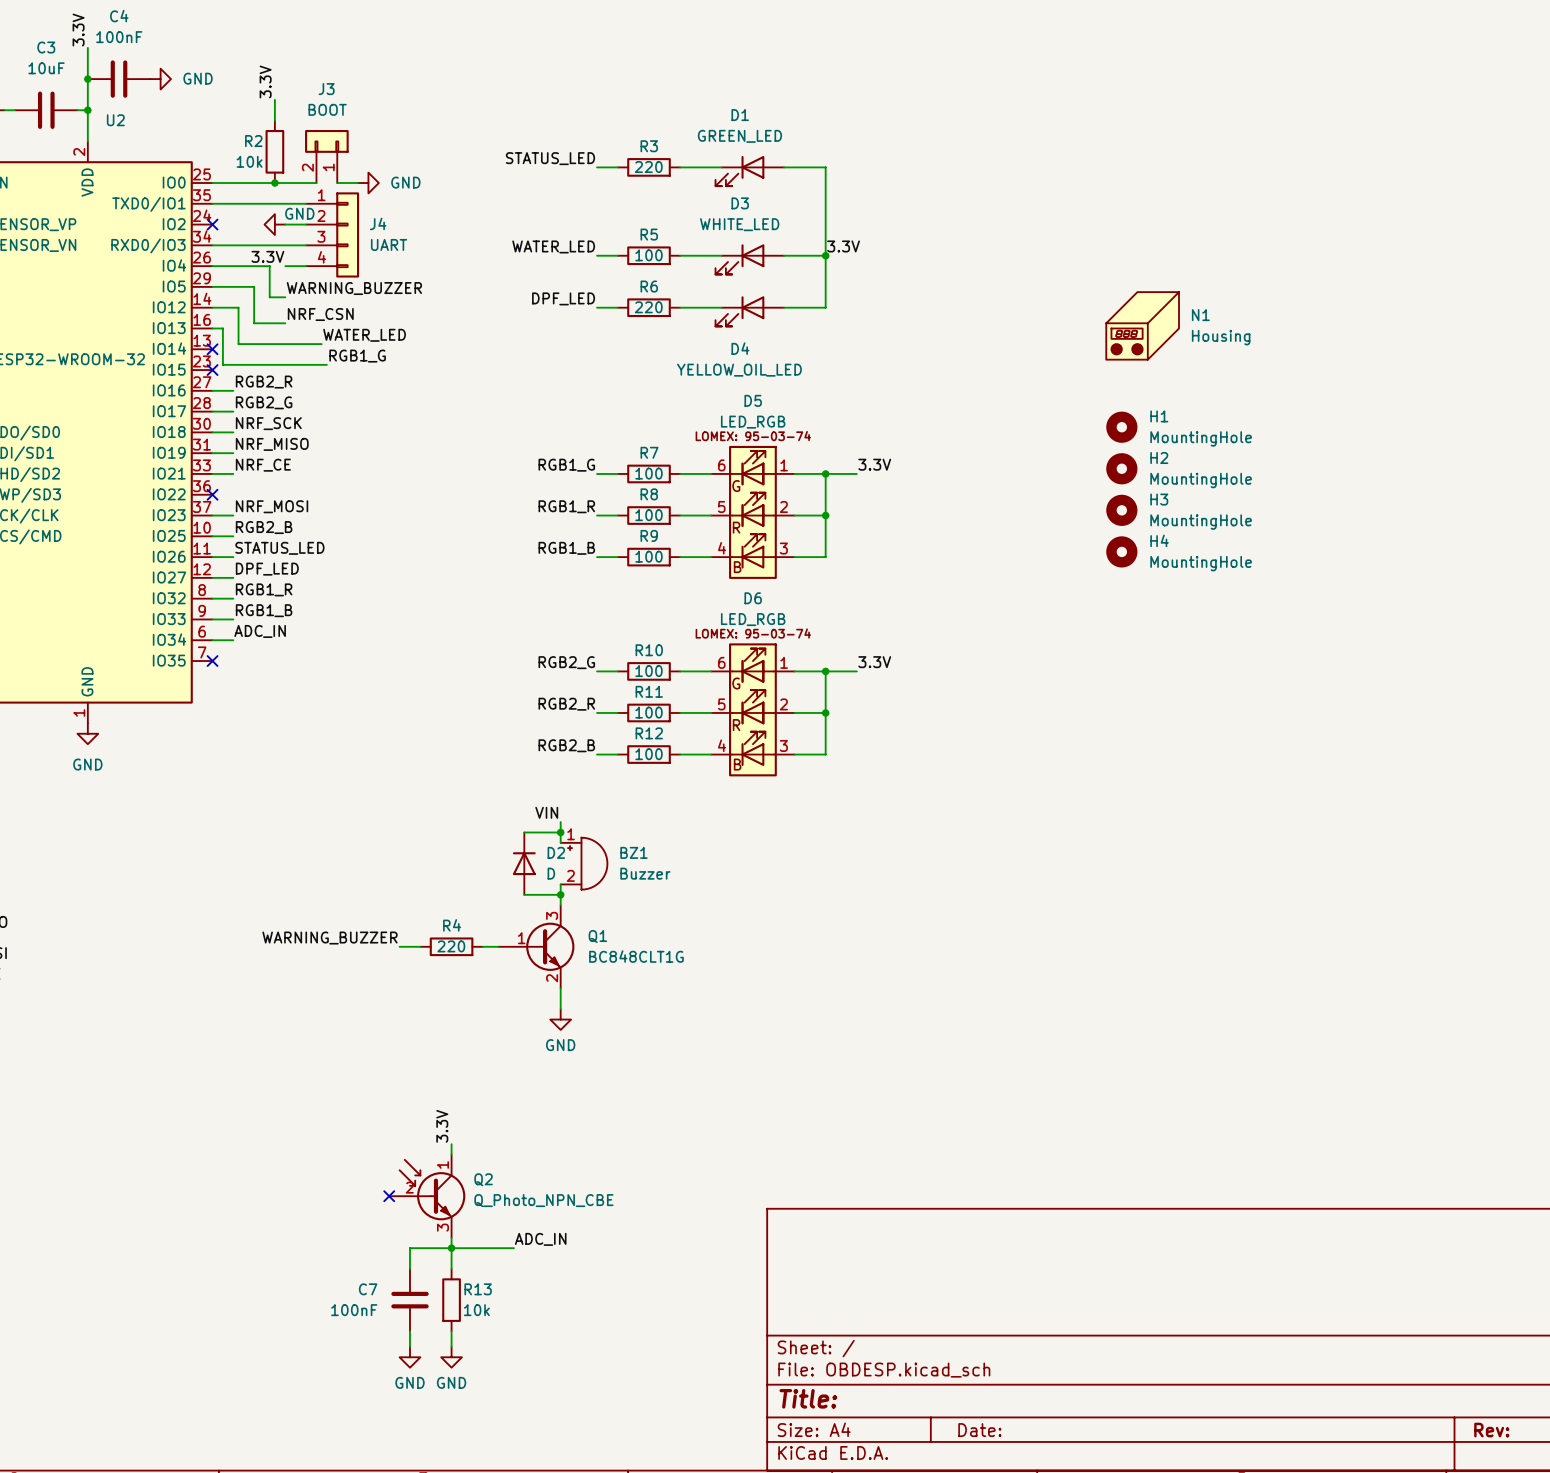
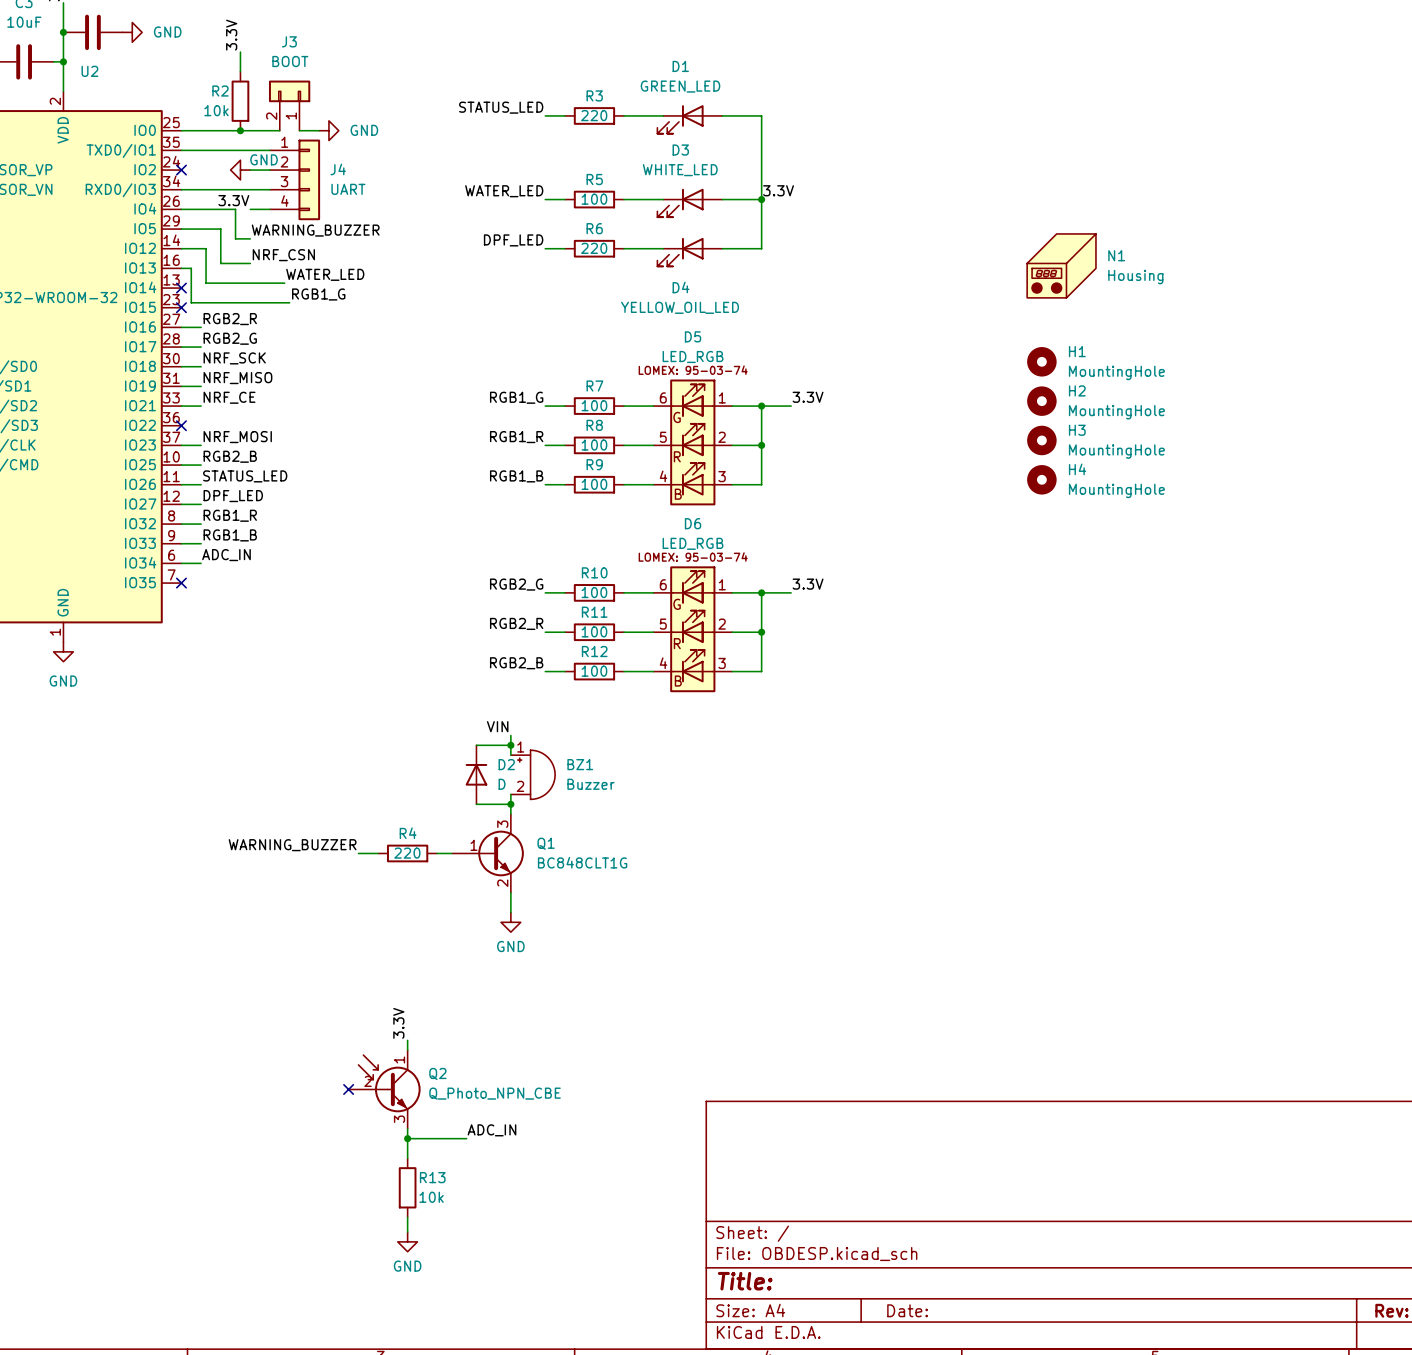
wire: (451, 1248) (410, 1248) (410, 1268) -> none
C7: 100nF (410, 1300) -> none
wire: (410, 1331) (410, 1346) -> none
power symbol: GND (410, 1357) -> none

